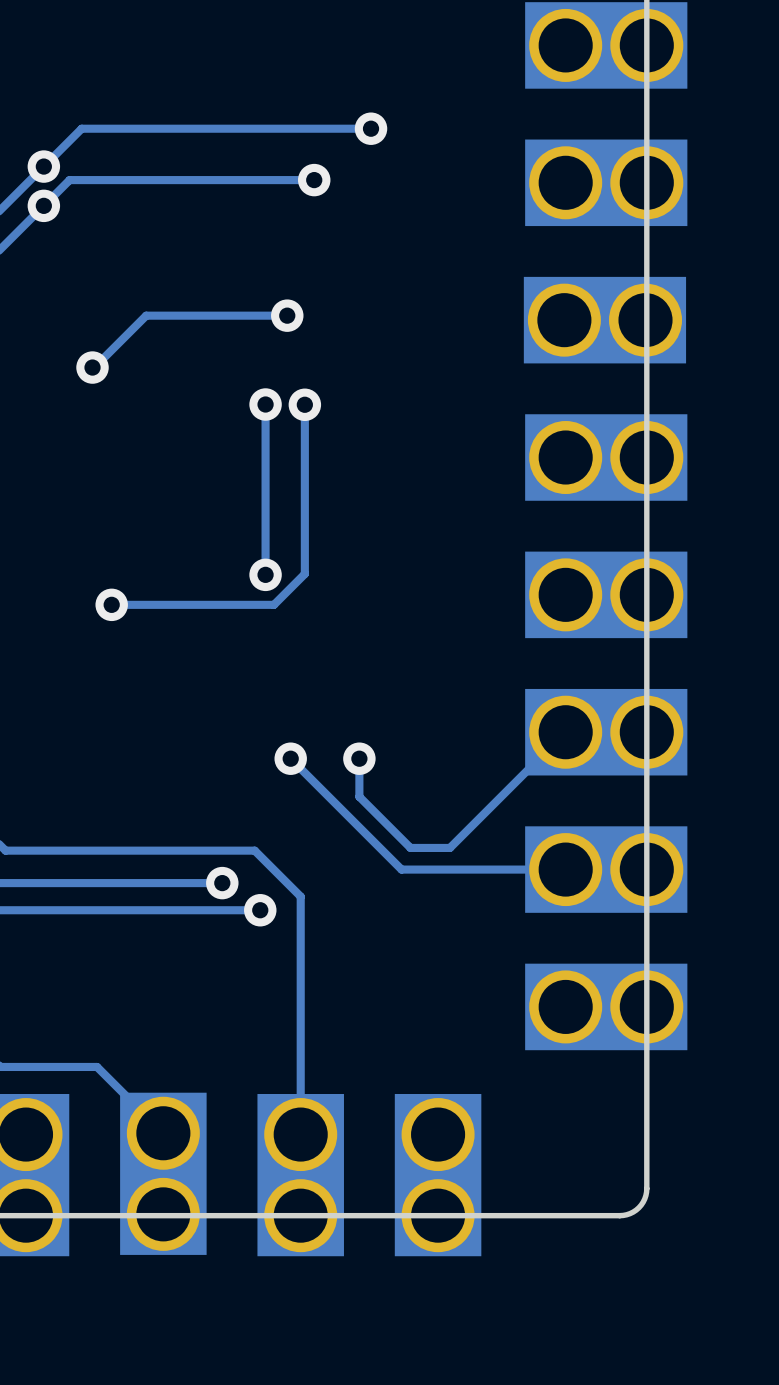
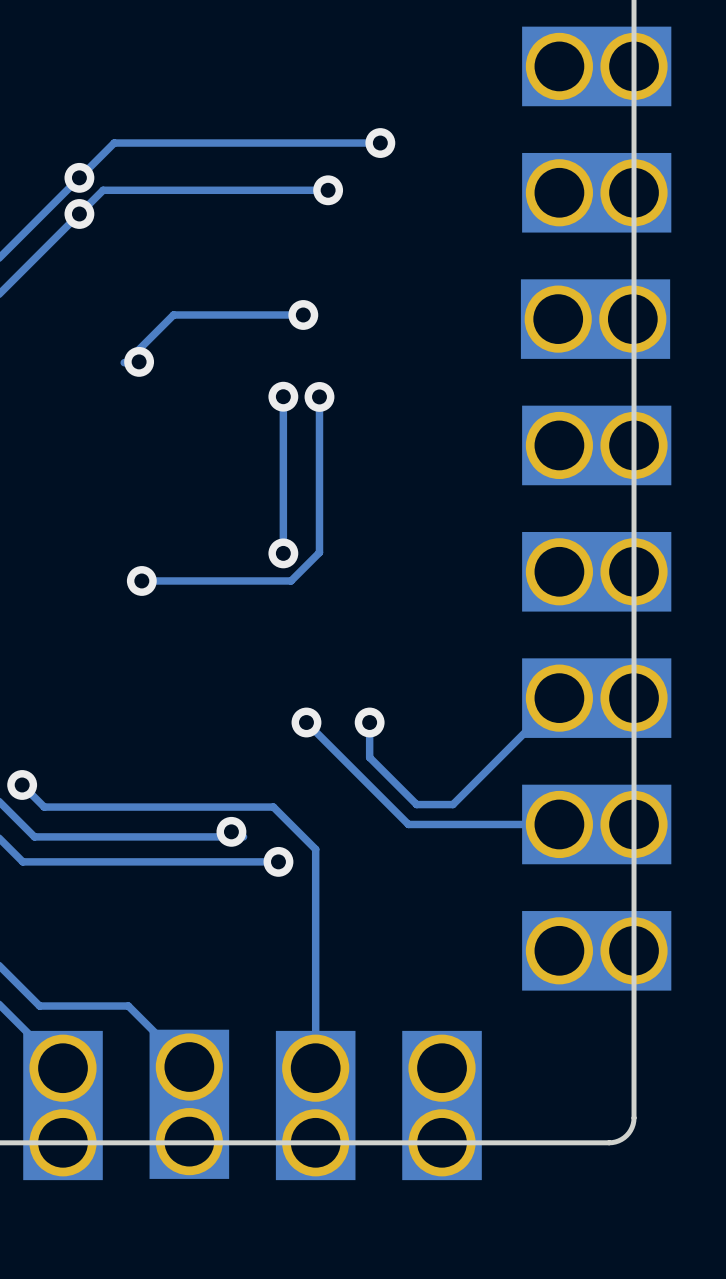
via position: (92, 367) -> (139, 361)
via position: (222, 883) -> (231, 831)

